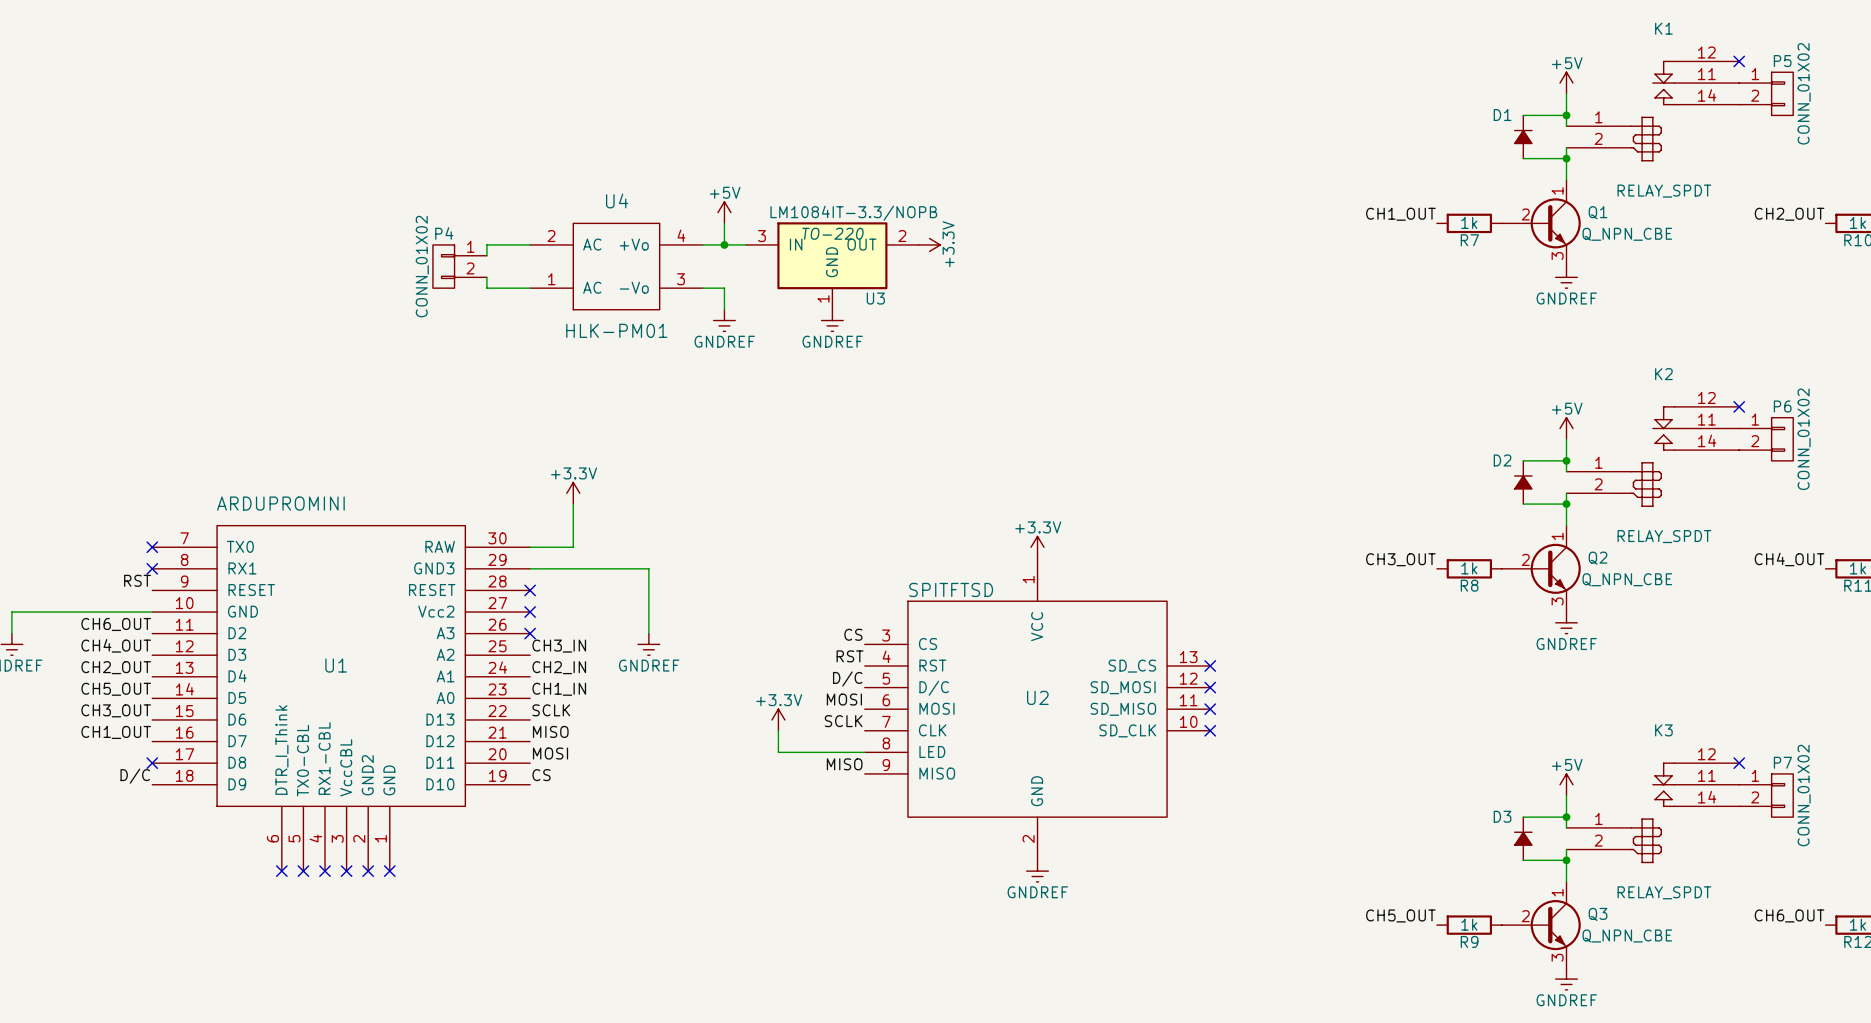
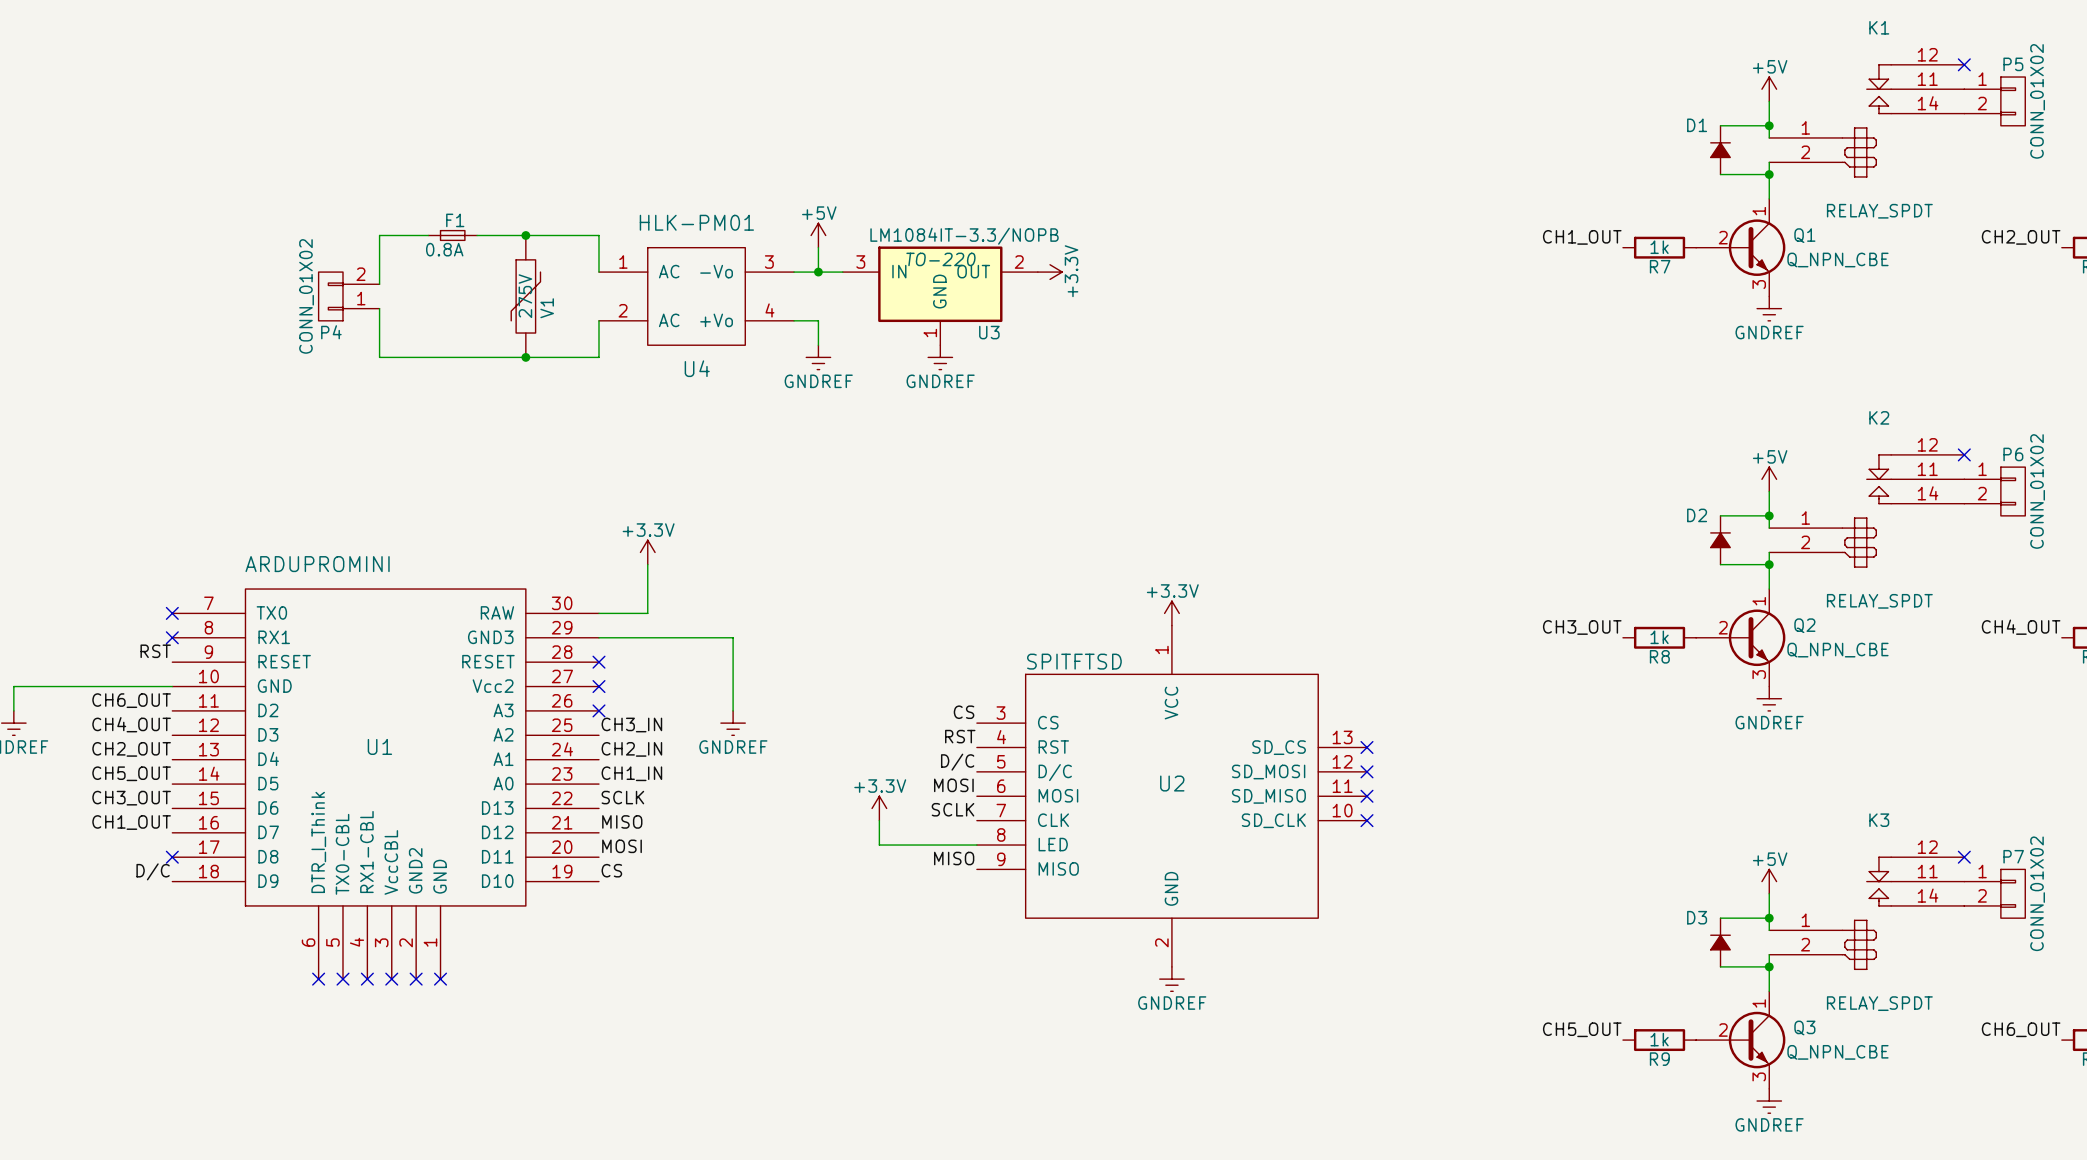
wire: none -> (428, 235) (379, 235) (379, 284)
F1: none -> 0.8A (452, 235)
junction: none -> (525, 235)
wire: (530, 244) (486, 244) (486, 255) -> (598, 272) (598, 235) (477, 235)
P4 flip: as is (443, 266) -> up-down (330, 296)
P4 position: (459, 266) -> (349, 296)
V1: none -> 275V (525, 296)
U4 flip: as is (616, 266) -> up-down (696, 296)
wire: (486, 277) (486, 288) (530, 288) -> (379, 308) (379, 357) (598, 357) (598, 320)
junction: none -> (525, 357)

